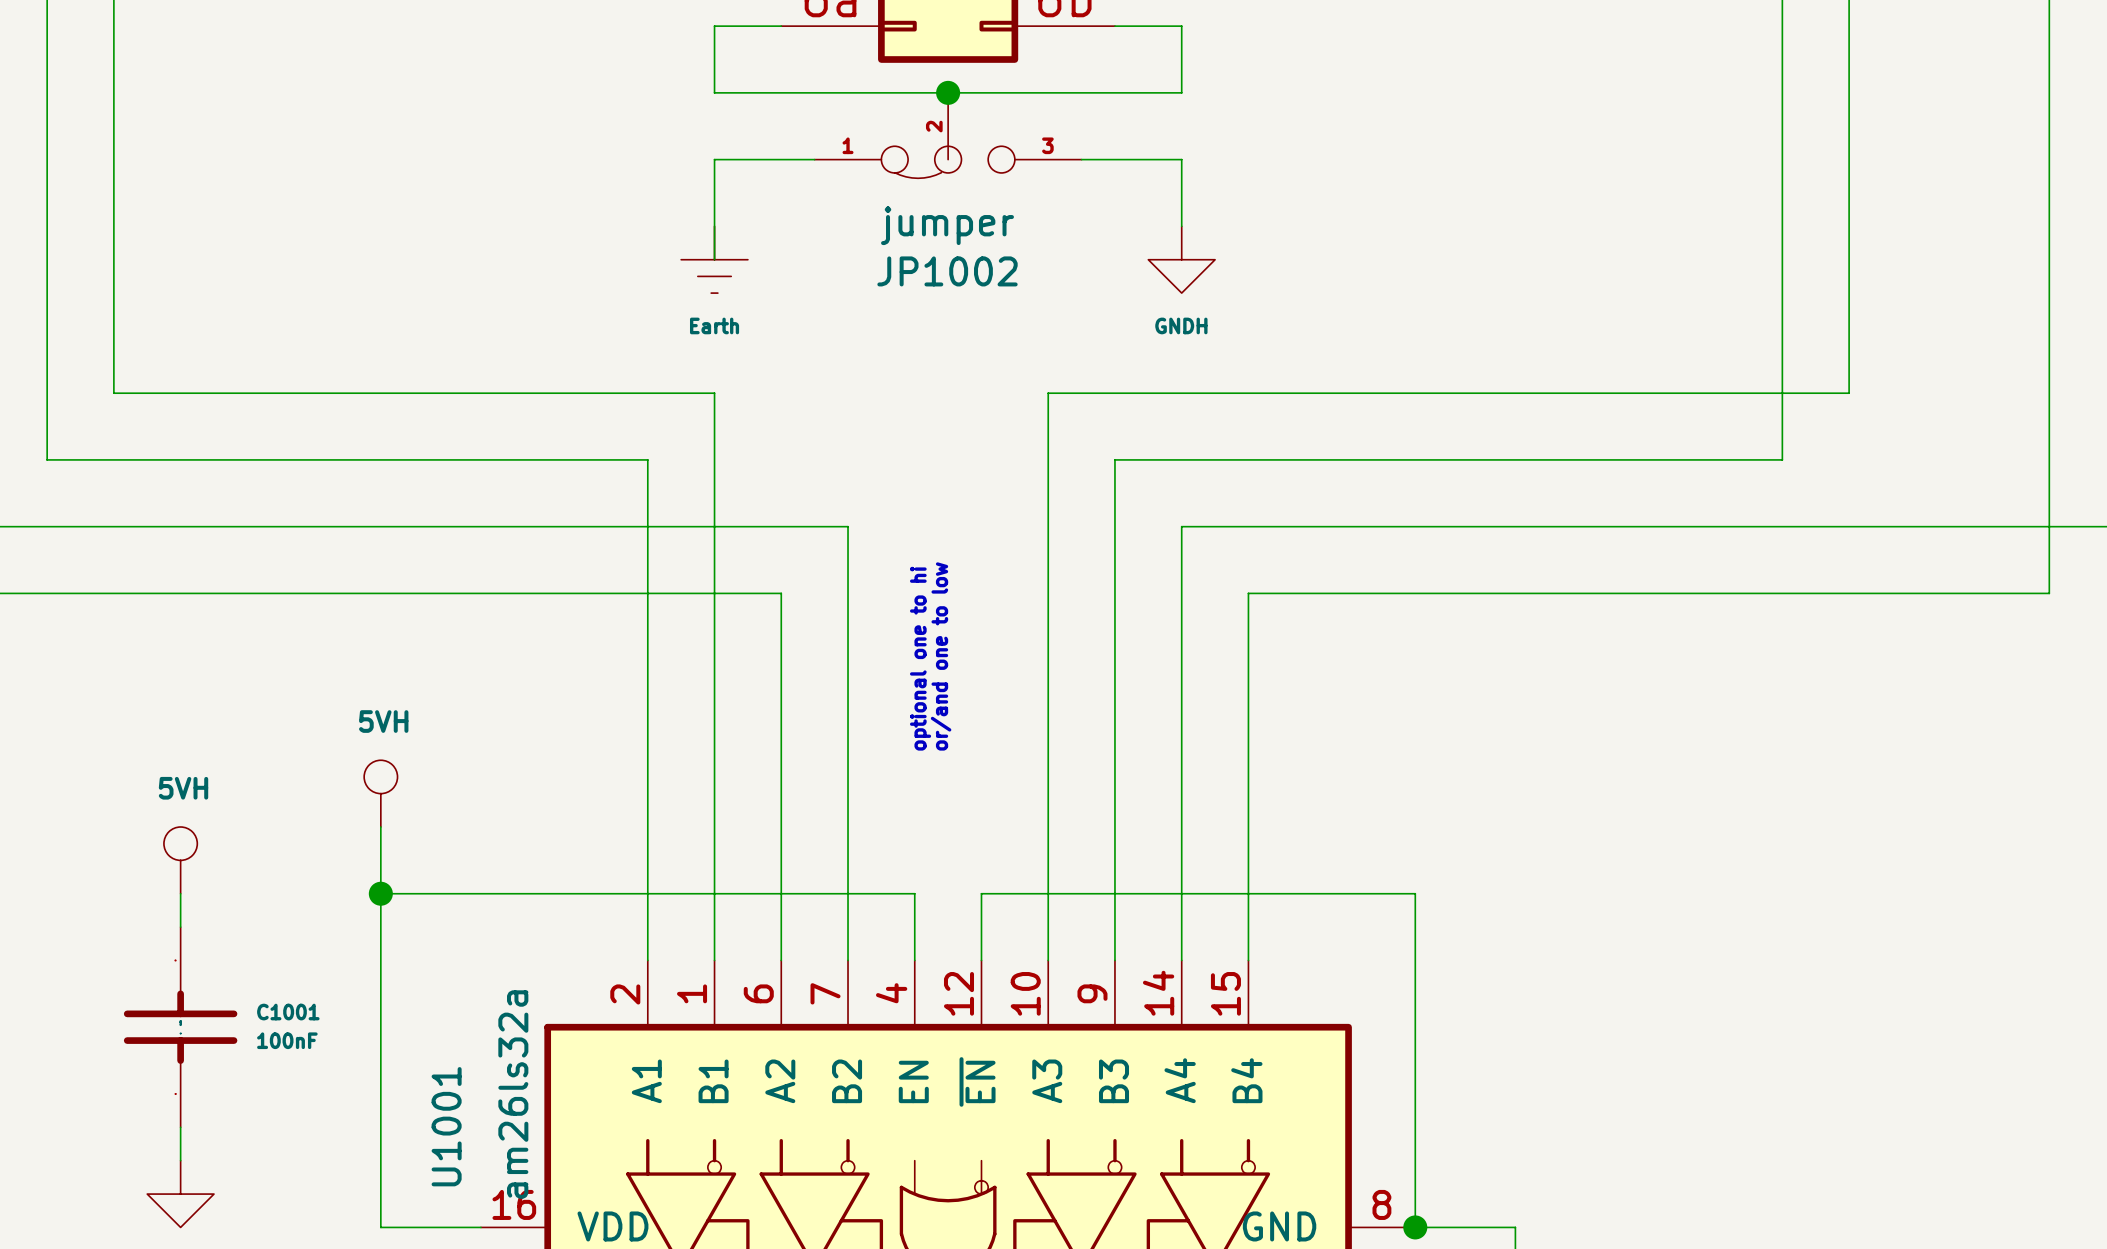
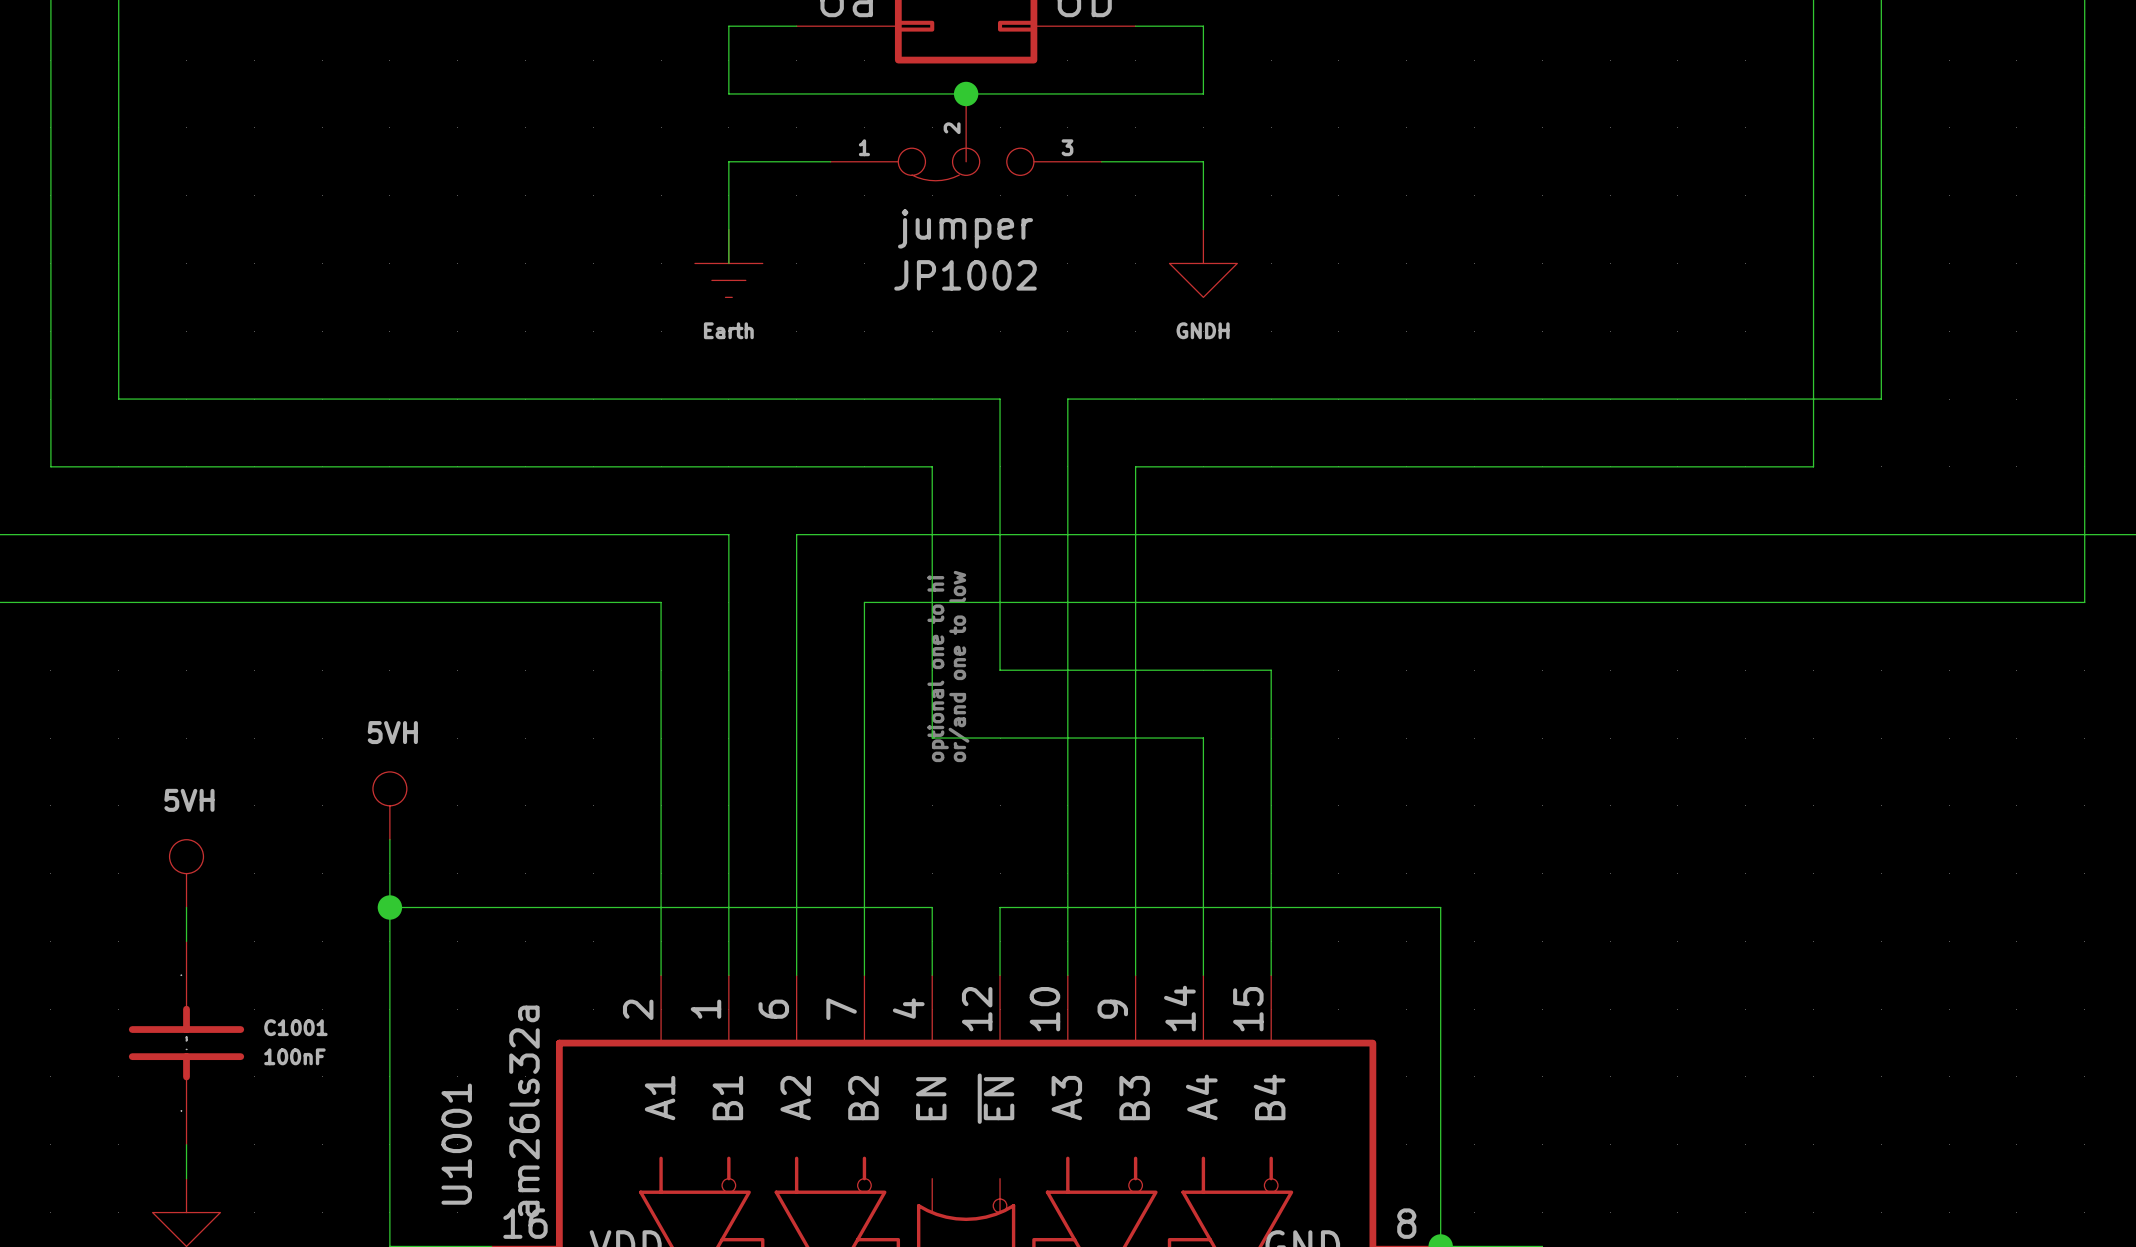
wire: (714, 393) (714, 526) (781, 526) -> (728, 399) (1000, 399) (1000, 670) (1271, 670)
wire: (647, 459) (647, 593) (781, 593) -> (796, 534) (796, 602)
wire: (848, 526) (848, 593) -> (864, 534) (1203, 534)
wire: (1181, 526) (1181, 726) -> (661, 466) (932, 466) (932, 738) (1203, 738)
wire: (1248, 593) (1248, 660) -> (1271, 602) (864, 602)

